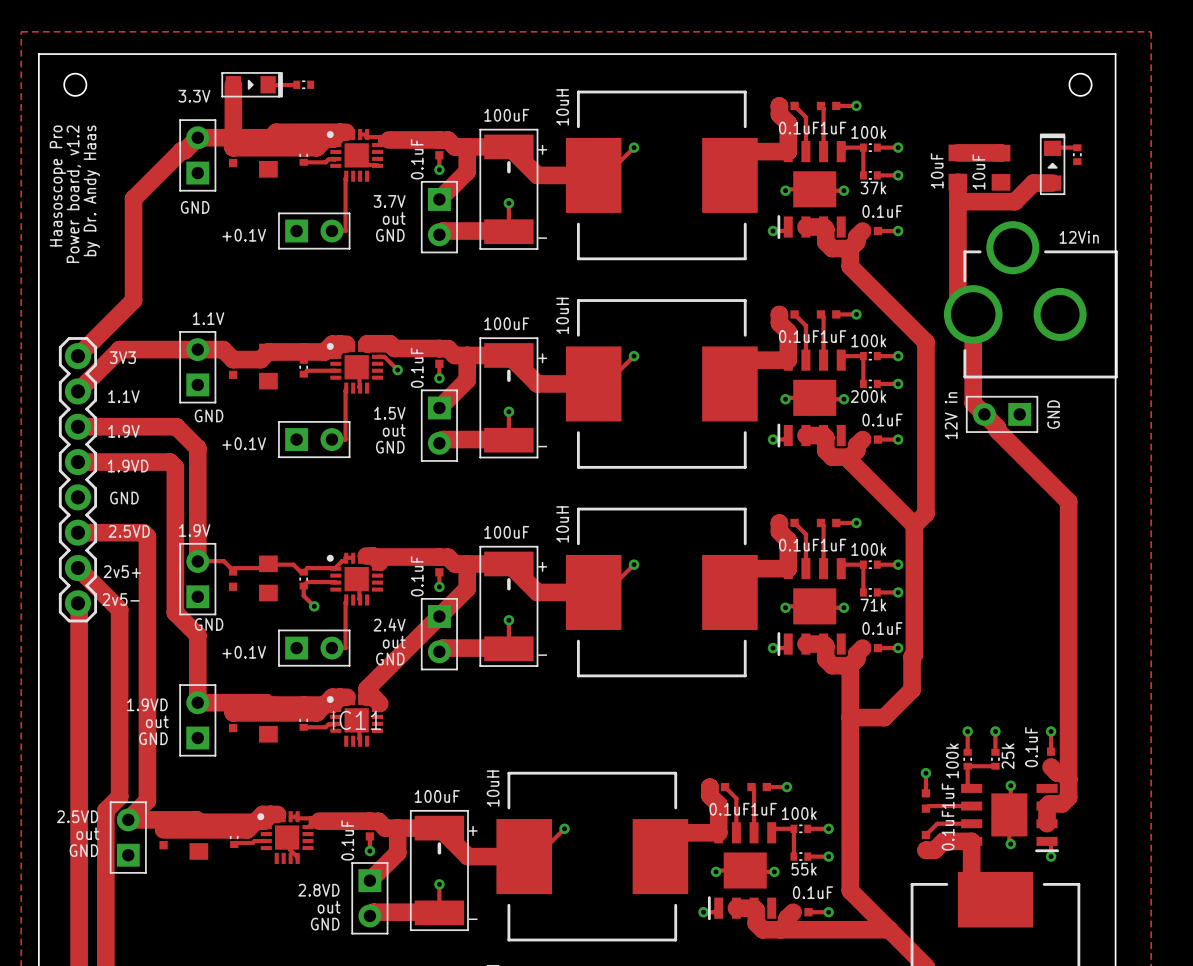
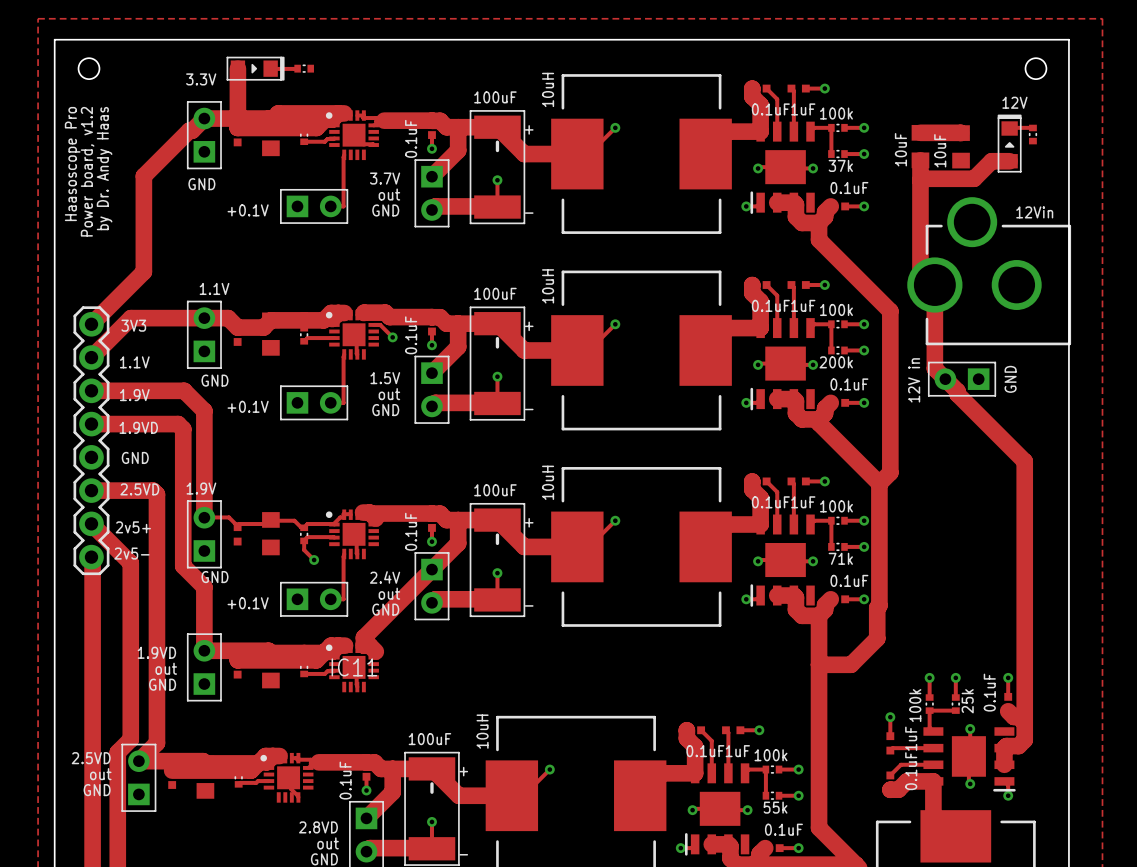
text: none -> 12V (1014, 102)

